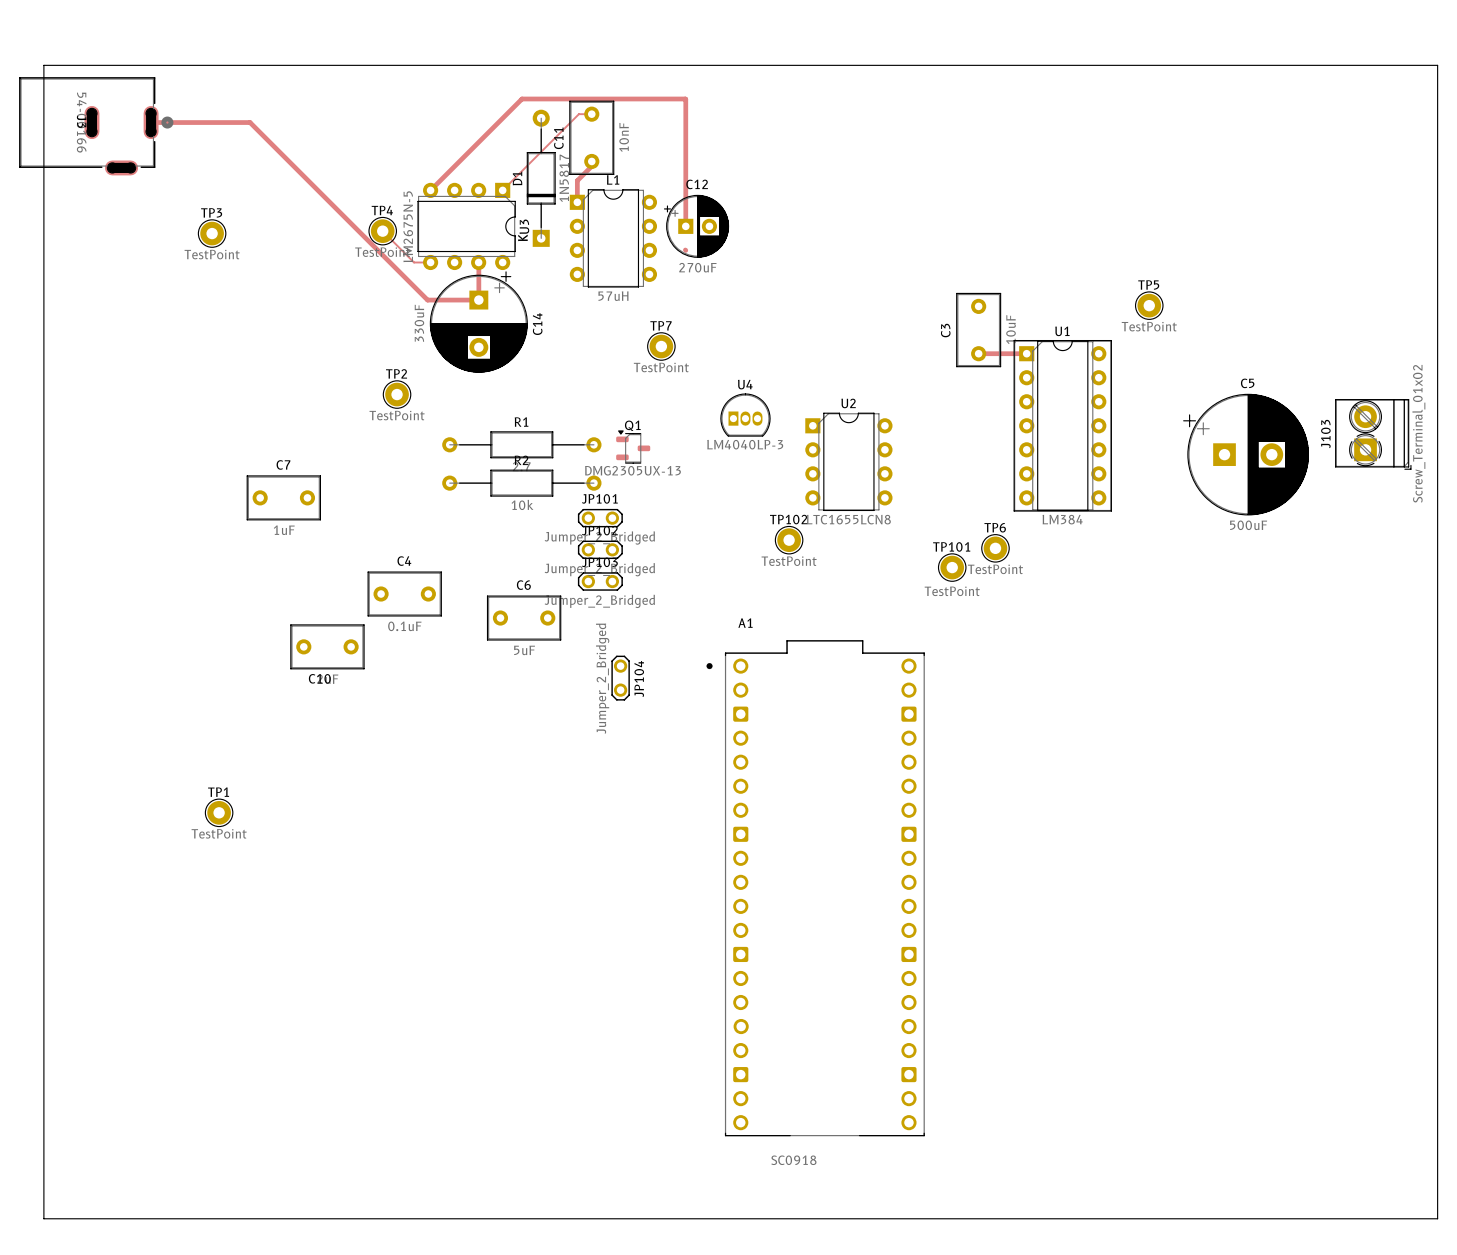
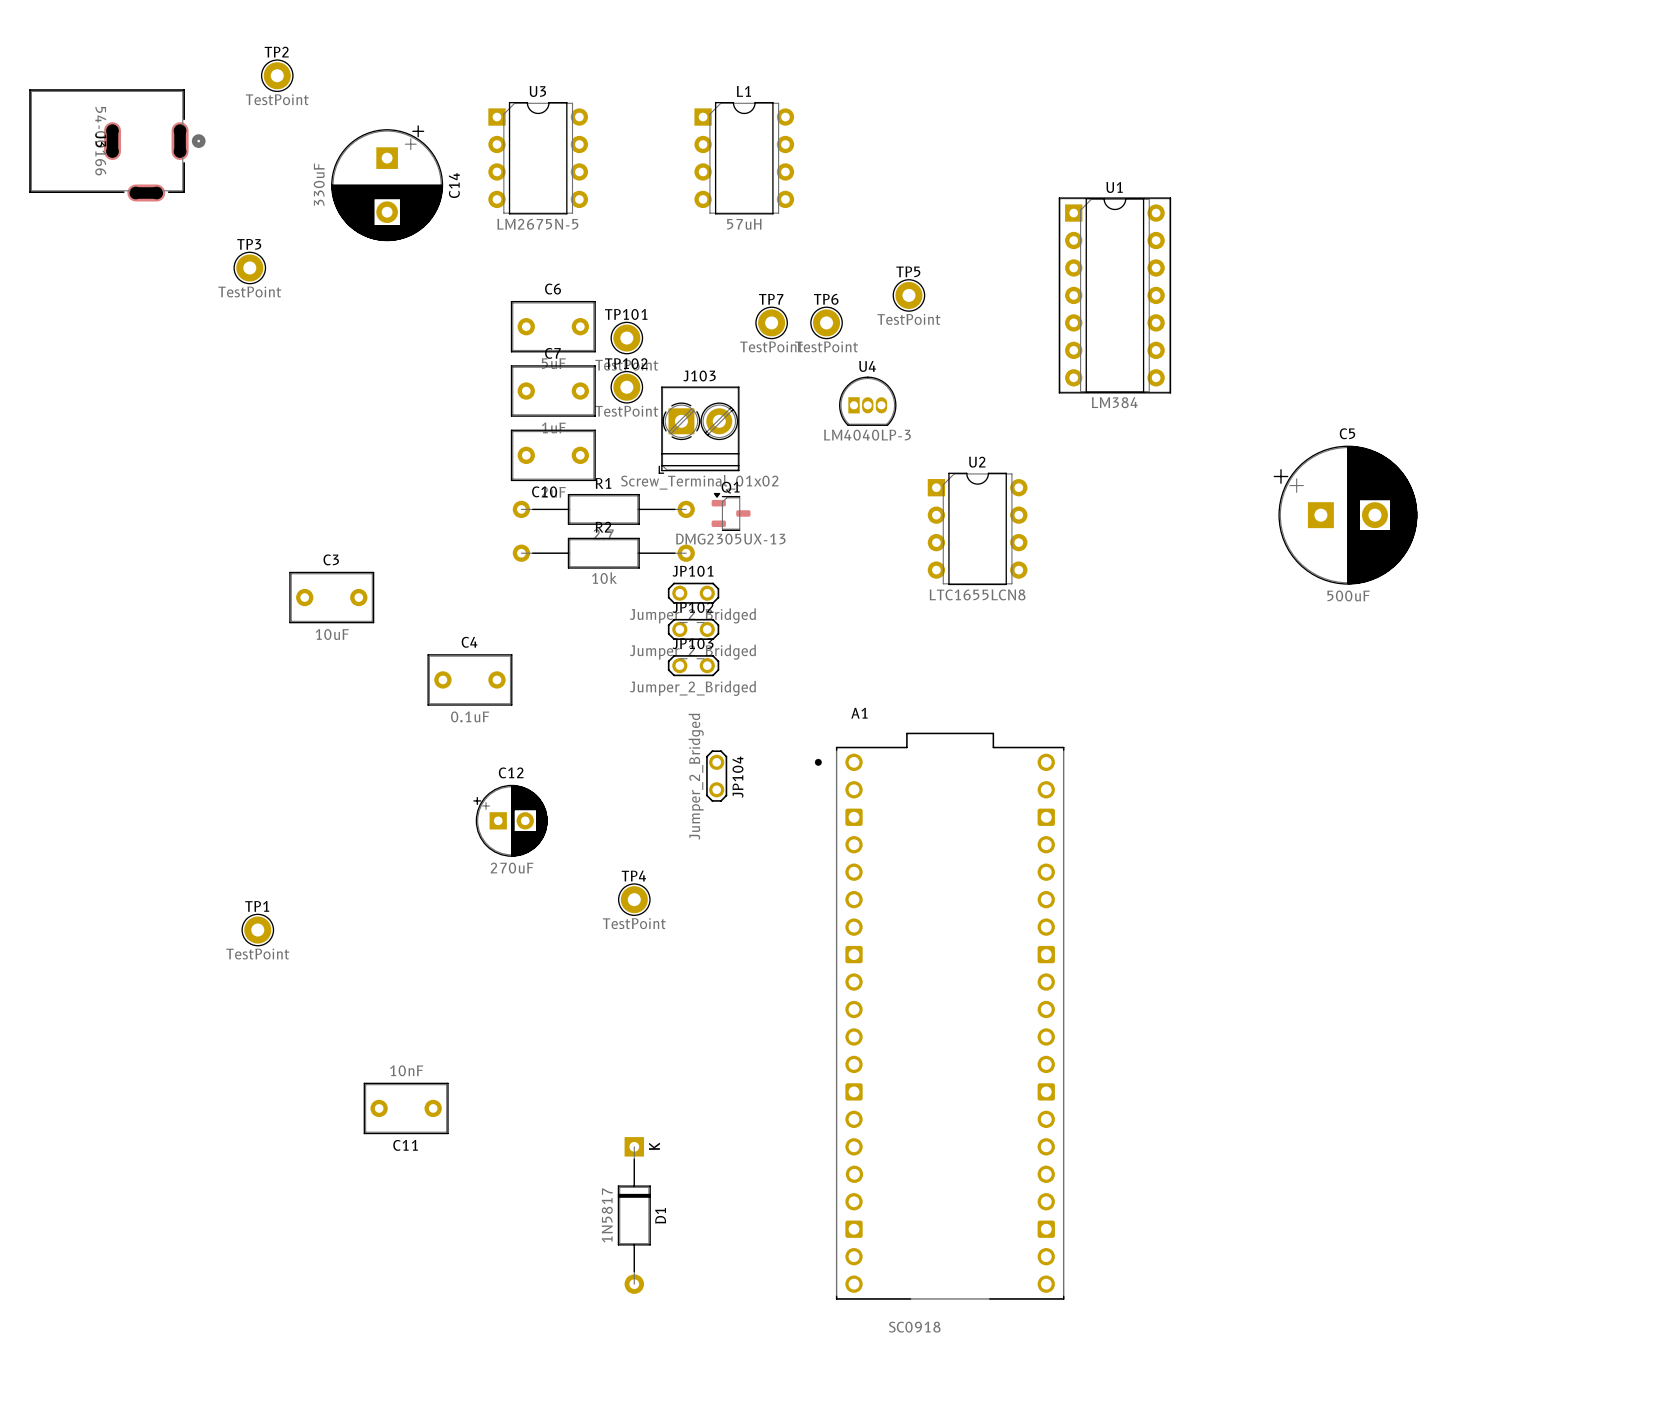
board edge: (43, 65) (1437, 65) (1437, 1218) (43, 1218) (43, 65) -> none
track: (591, 114) (578, 114) (502, 190) -> none
track: (158, 122) (250, 122) (427, 300) (478, 300) (478, 262) -> none
C11 rotation: 0° (591, 137) -> 90° clockwise (406, 1108)
C11 position: (591, 137) -> (406, 1108)
C11 value position: 10nF (624, 137) -> 10nF (406, 1070)
C11 name position: C11 (558, 138) -> C11 (405, 1145)
track: (591, 161) (594, 163) (577, 180) (577, 202) -> none
D1 rotation: 0° (541, 178) -> 180° (634, 1215)
D1 position: (541, 178) -> (634, 1215)
track: (430, 190) (521, 98) (685, 98) (685, 226) -> none
U3 rotation: 0° (466, 226) -> 90° counterclockwise (538, 158)
U3 position: (466, 226) -> (538, 158)
C12 position: (696, 226) -> (510, 820)
track: (382, 231) (414, 262) (430, 262) -> none
TP4 position: (382, 231) -> (634, 899)
L1 position: (613, 238) -> (744, 158)
track: (685, 250) (685, 250) -> none
TP5 position: (1149, 305) -> (908, 295)
C14 position: (478, 322) -> (387, 183)
C3 rotation: 0° (978, 330) -> 90° clockwise (331, 597)
C3 position: (978, 330) -> (331, 597)
TP7 position: (661, 346) -> (771, 322)
track: (978, 353) (1026, 353) -> none
TP2 position: (397, 394) -> (277, 75)
U4 position: (745, 415) -> (867, 401)
U1 position: (1062, 425) -> (1114, 295)
J103 rotation: 0° (1373, 434) -> 90° clockwise (699, 430)
J103 position: (1373, 434) -> (699, 430)
C5 position: (1246, 454) -> (1345, 515)
C7 position: (283, 497) -> (553, 391)
TP102 position: (789, 540) -> (626, 387)
TP6 position: (995, 548) -> (826, 322)
TP101 position: (952, 567) -> (626, 338)
C6 position: (524, 618) -> (553, 326)
C10 position: (327, 646) -> (553, 455)

